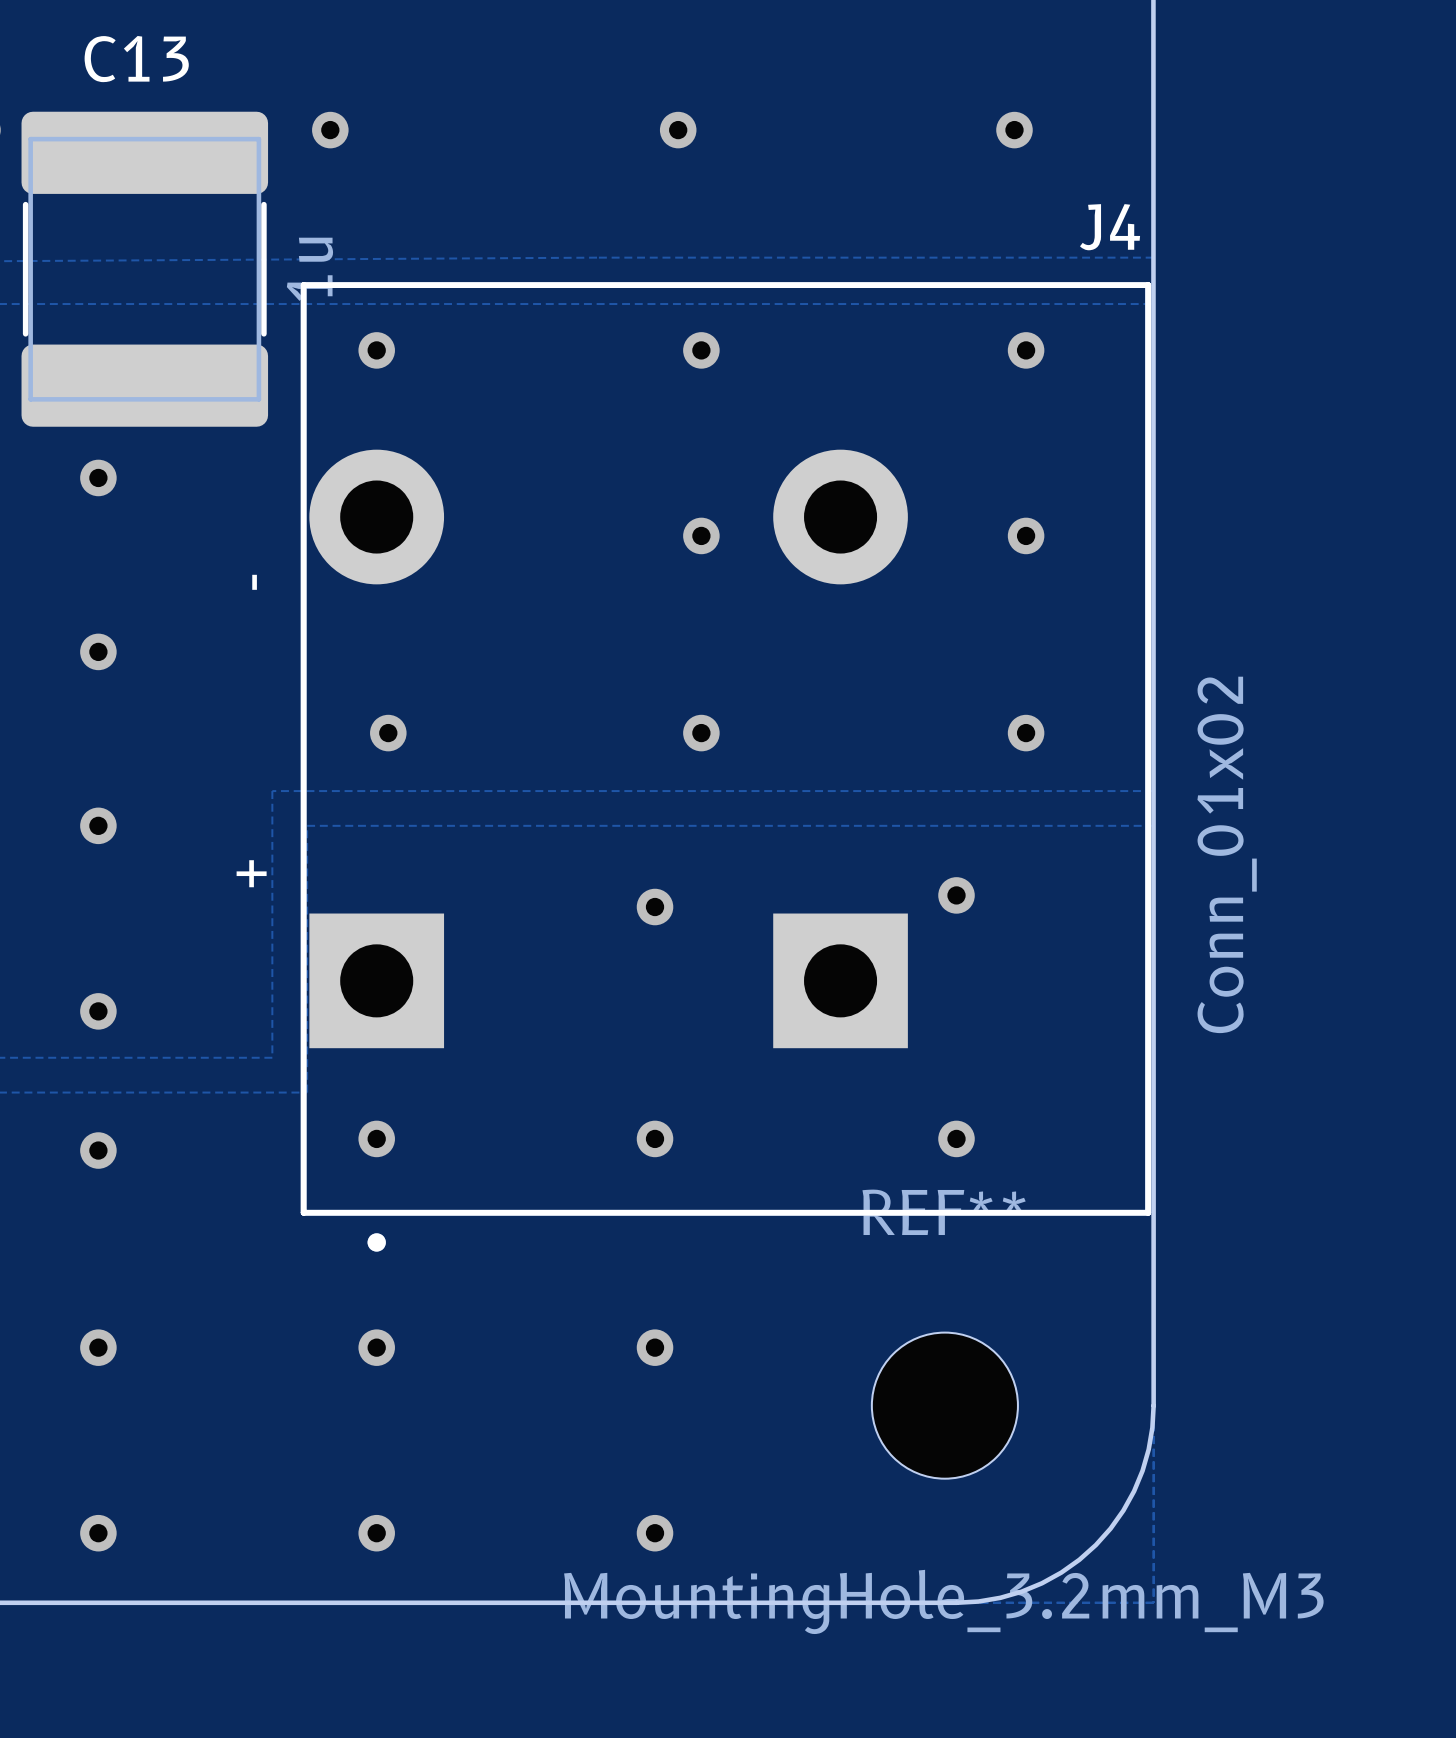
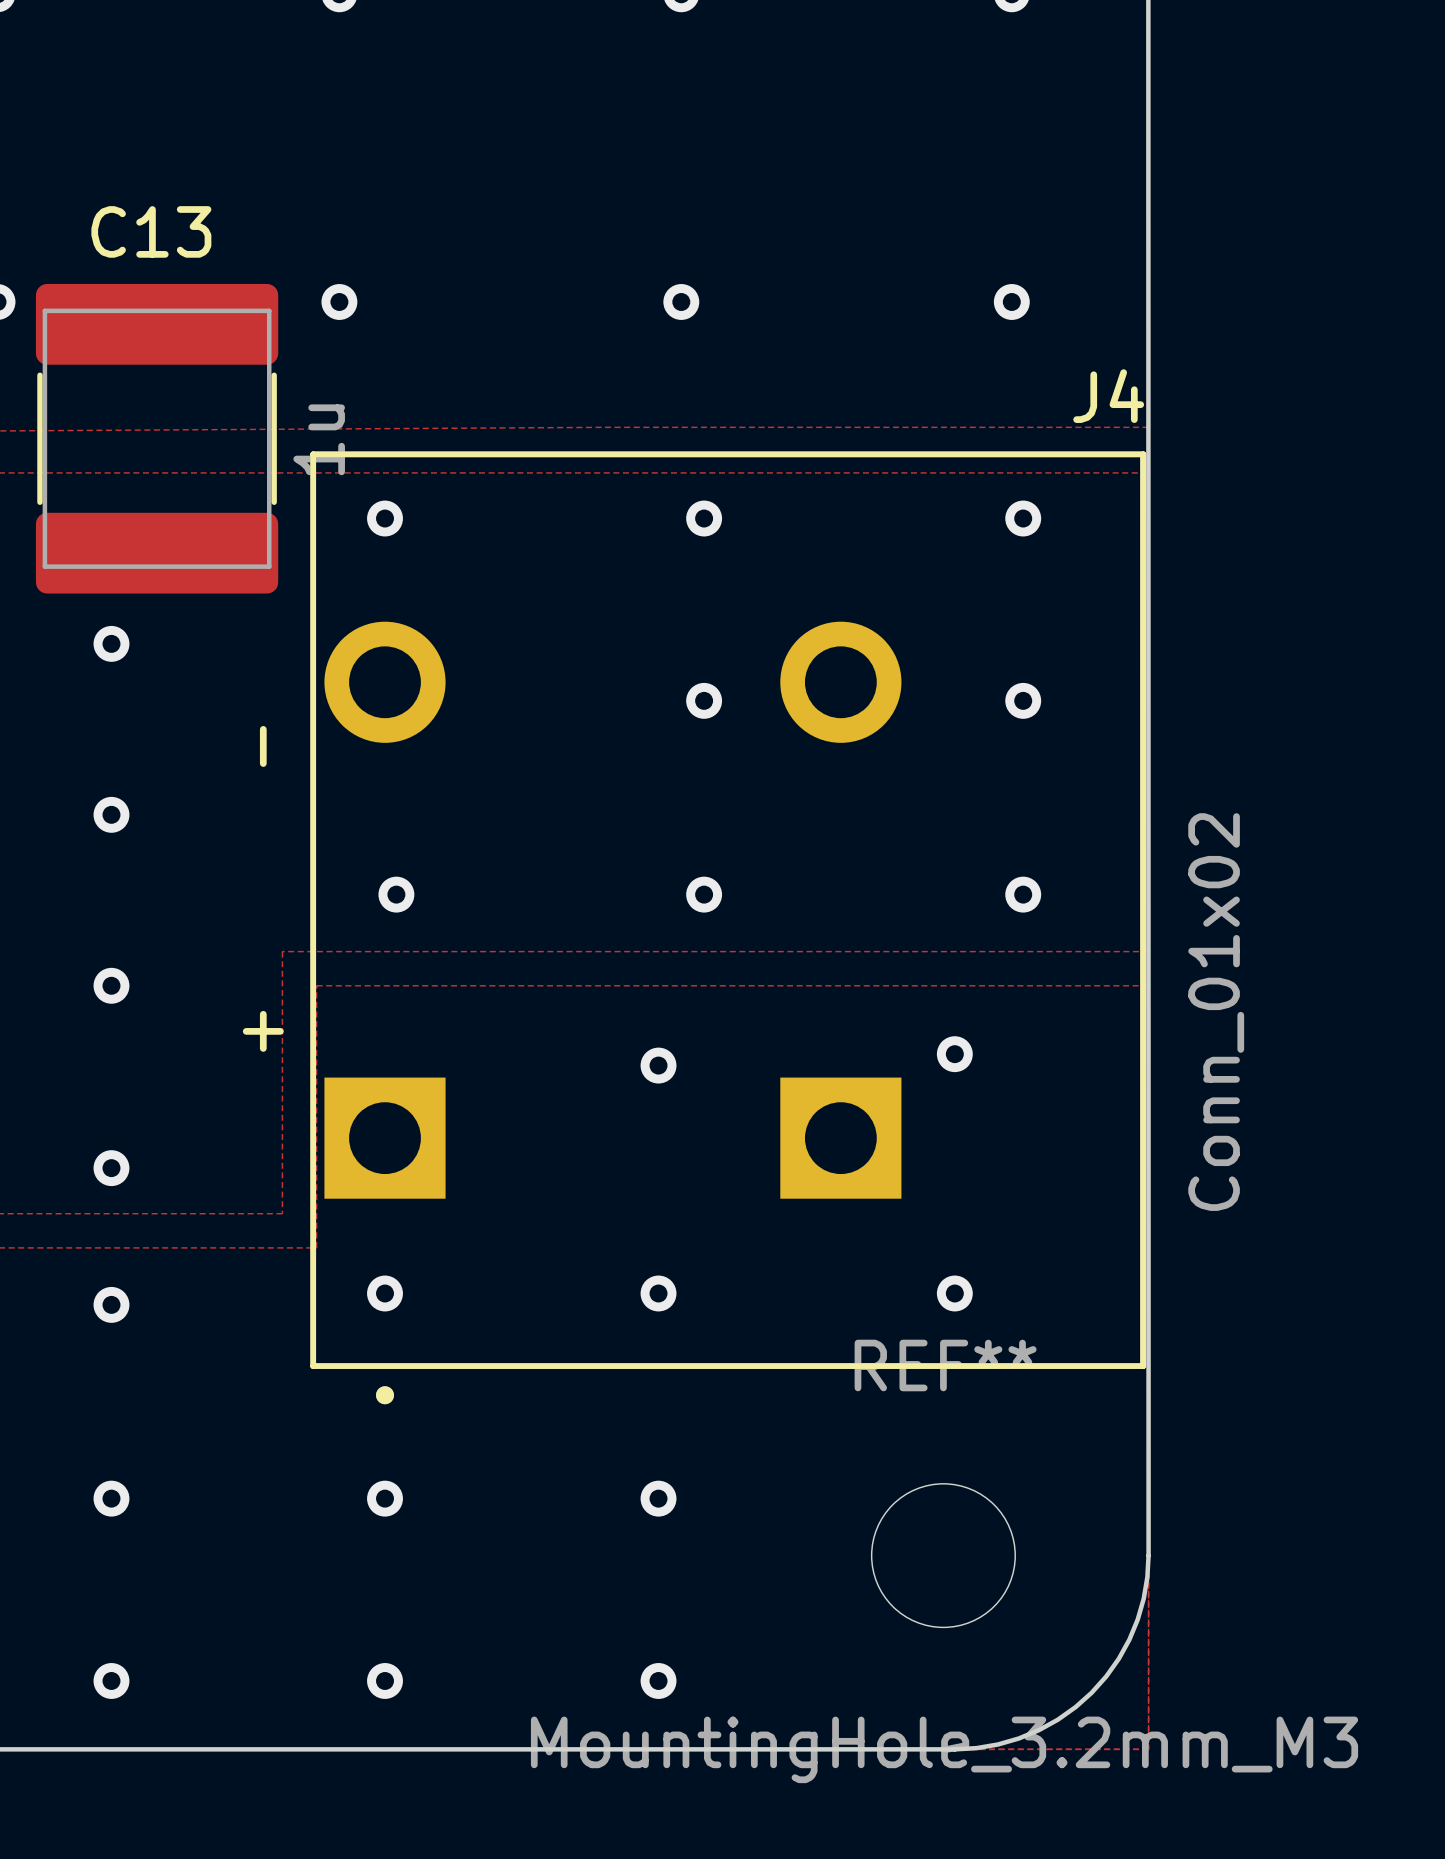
J4 footprint: [300, 282, 1152, 1252] -> [310, 451, 1147, 1405]

